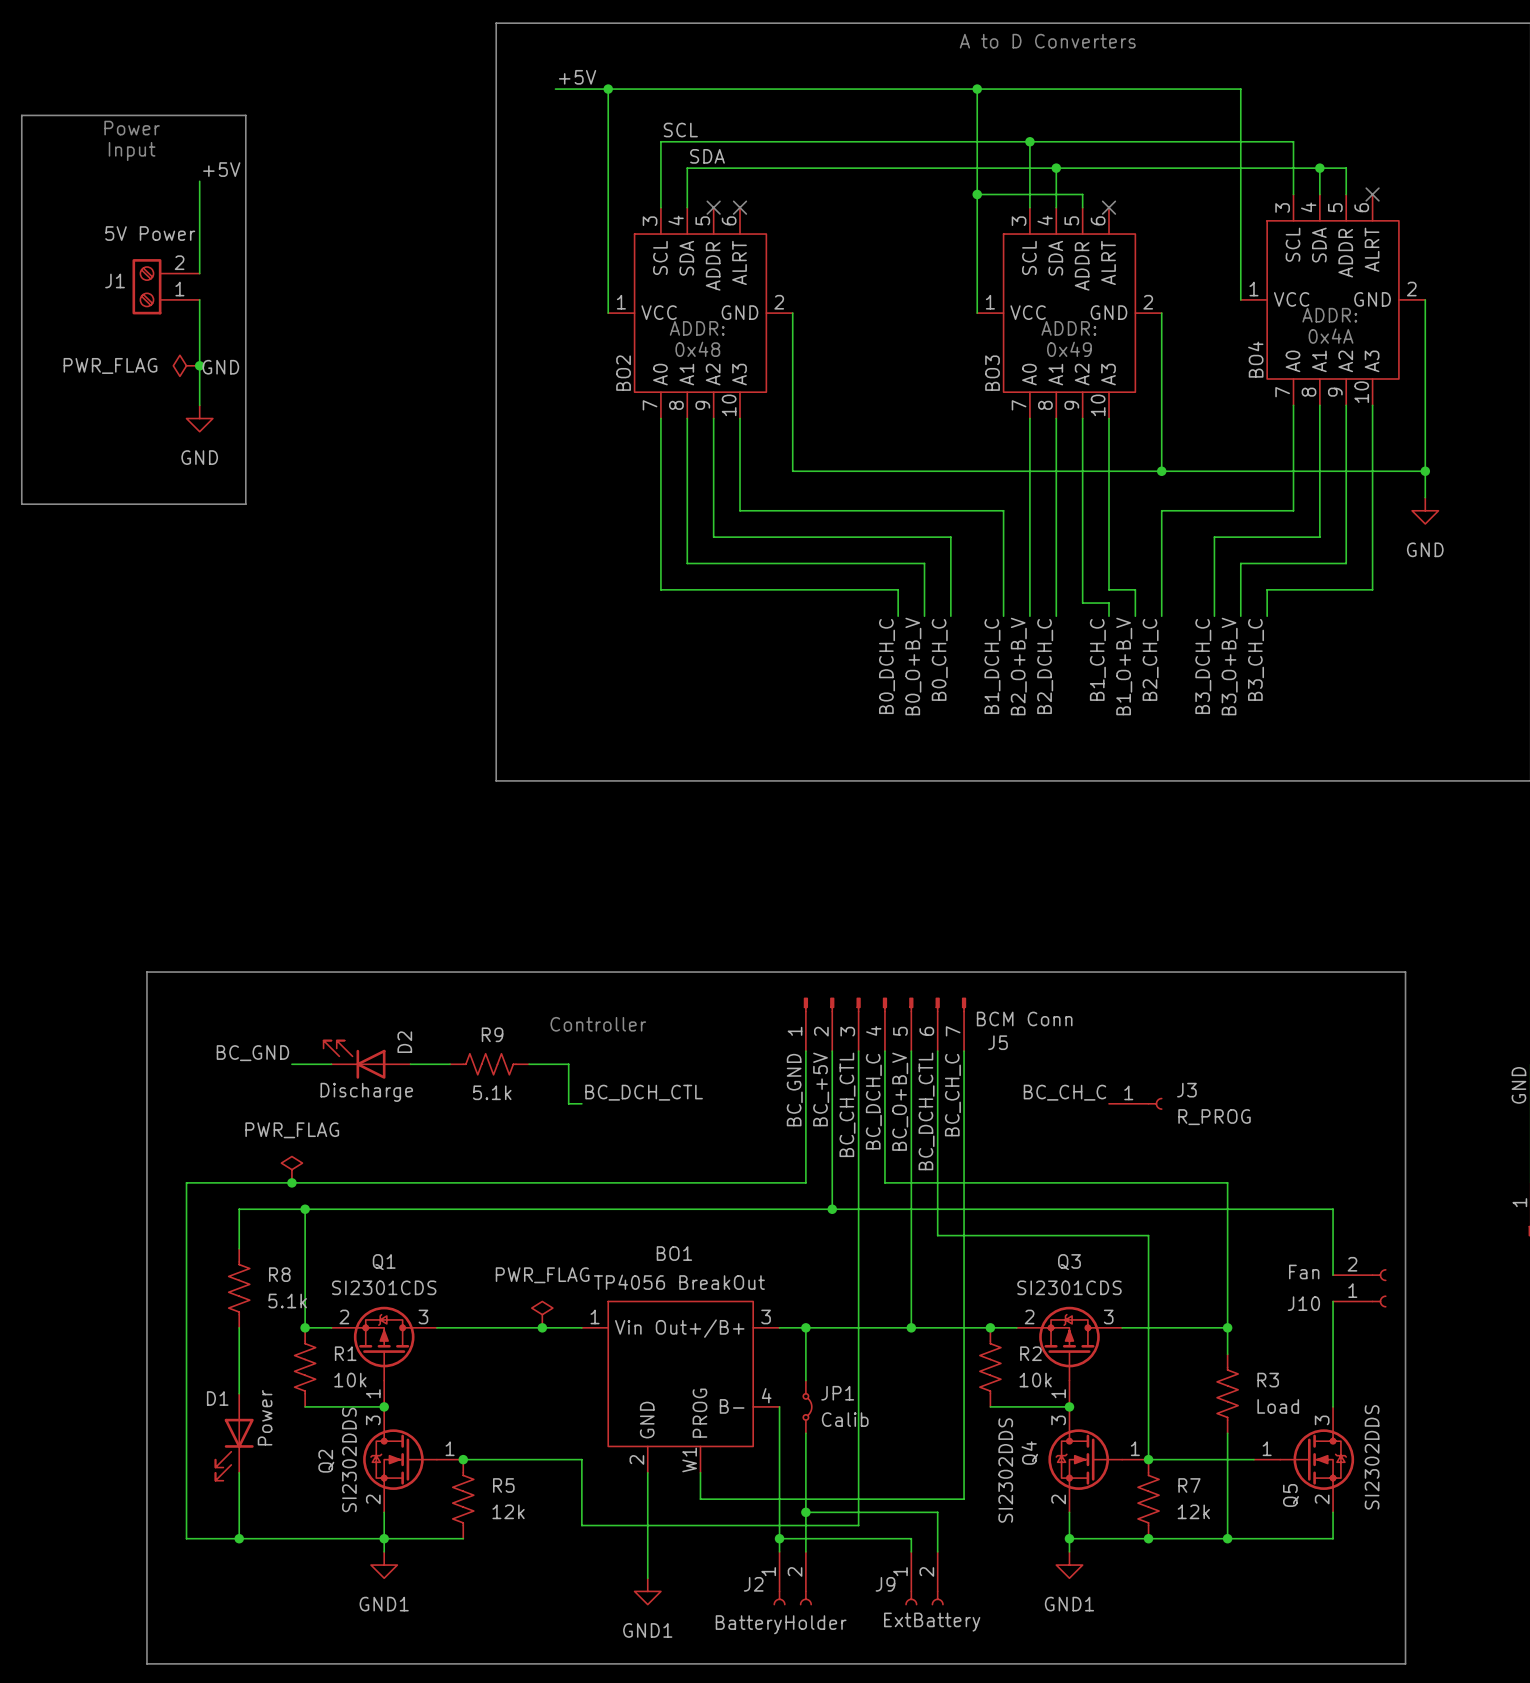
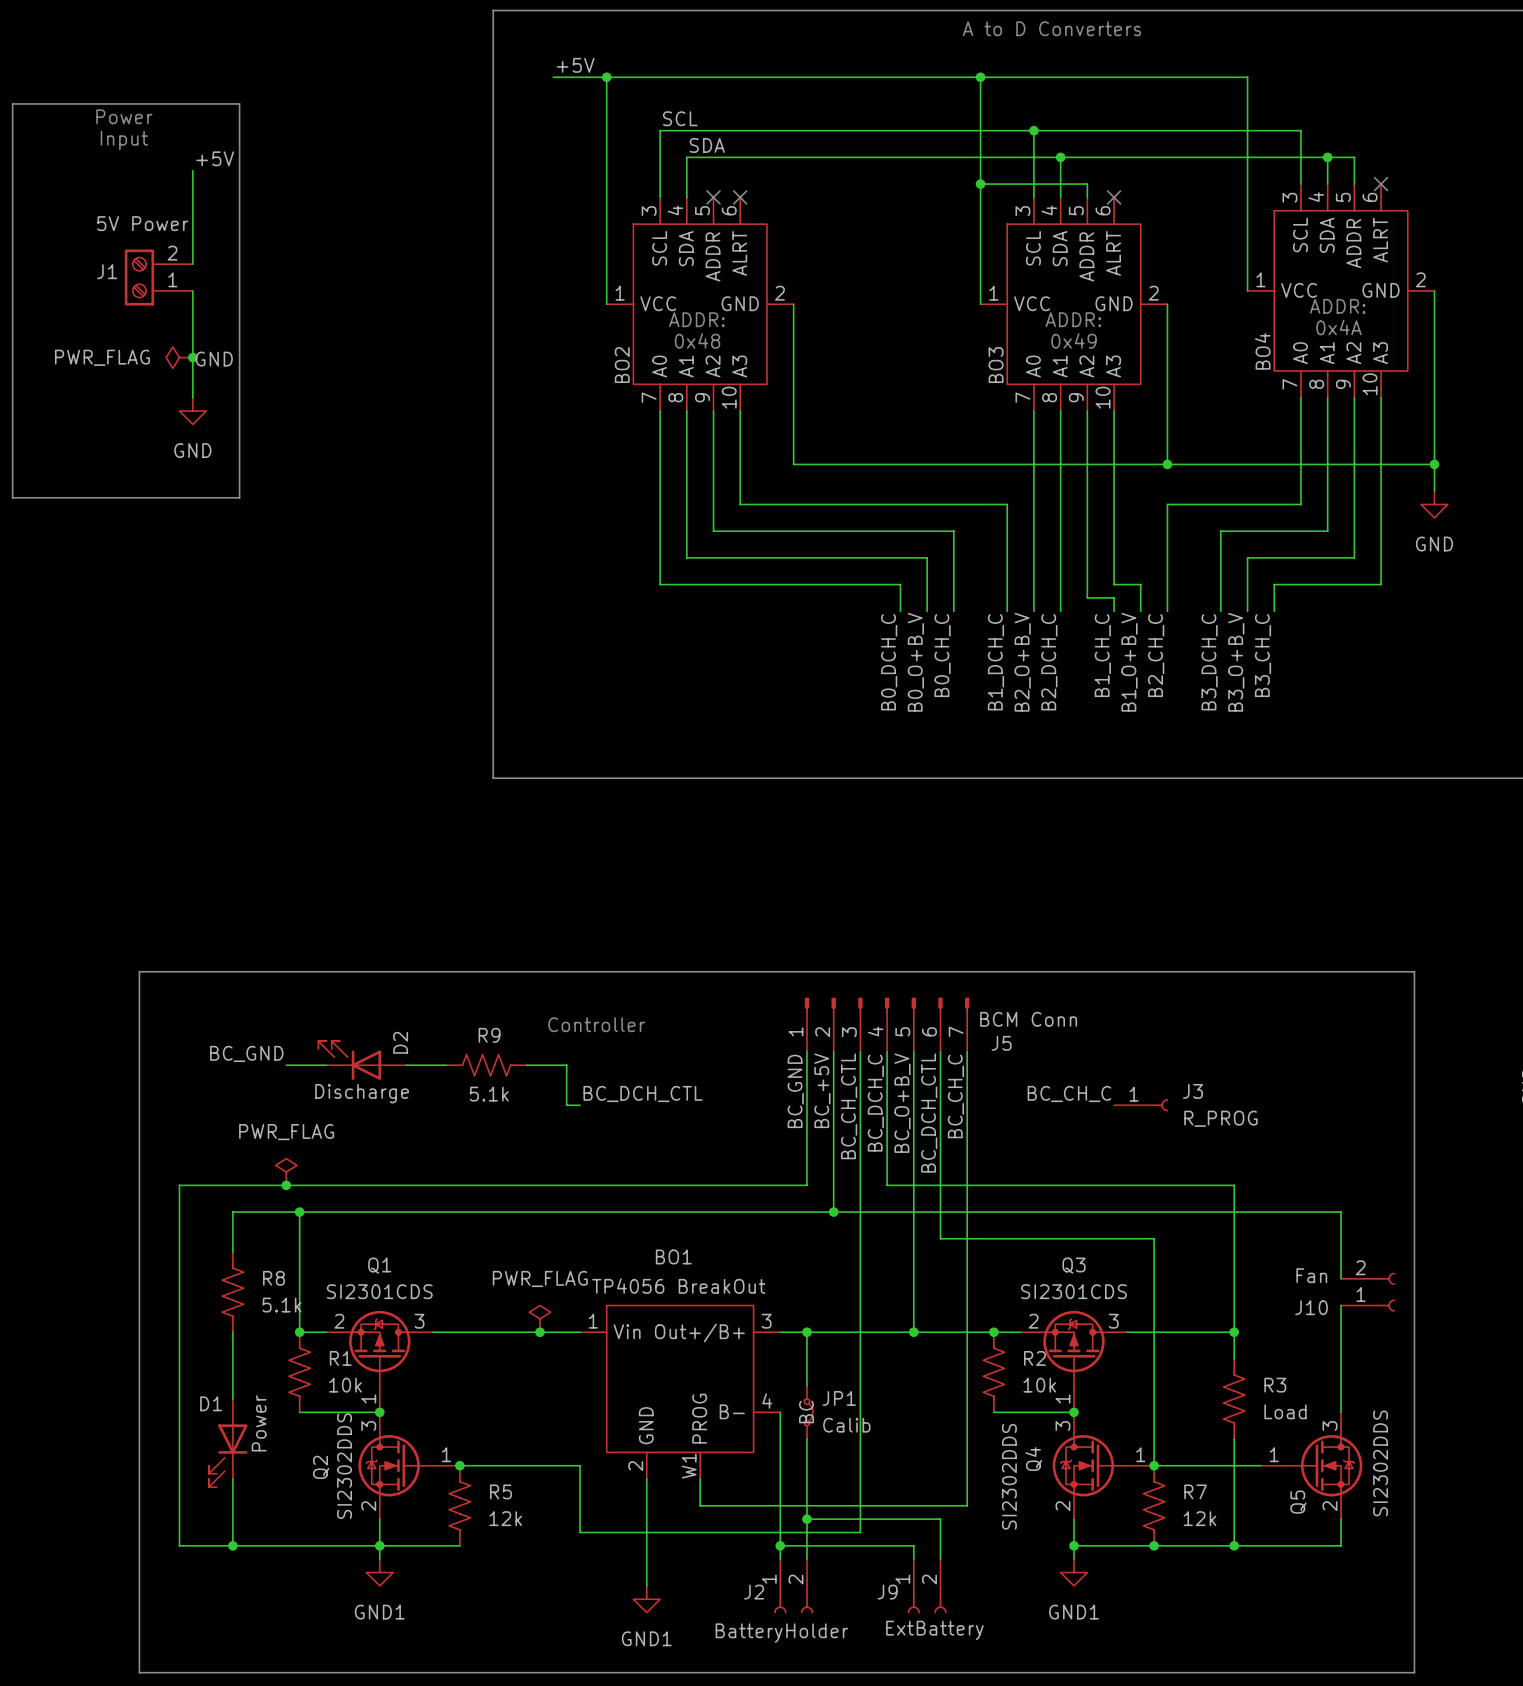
JP1 text: none -> BC (806, 1412)

